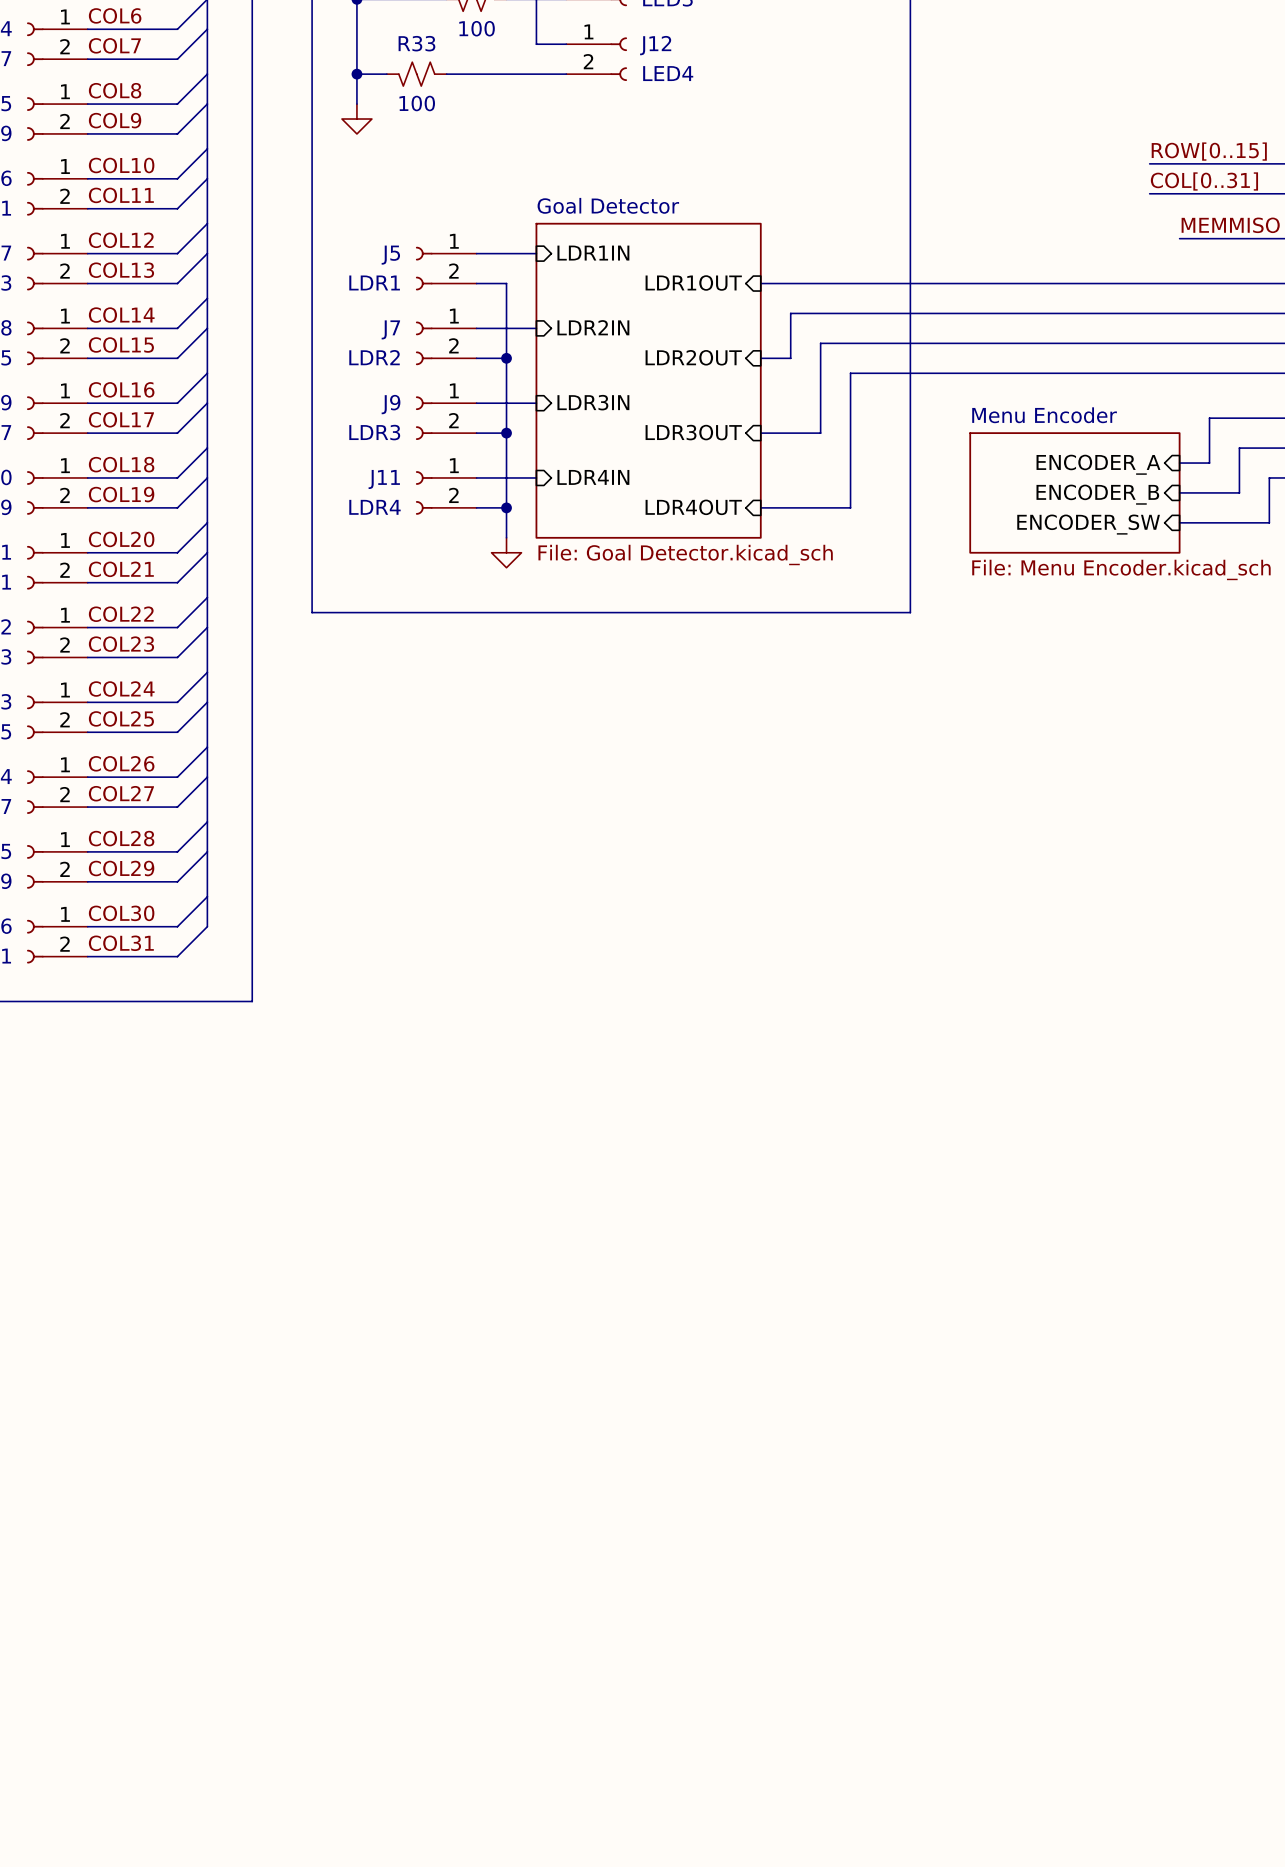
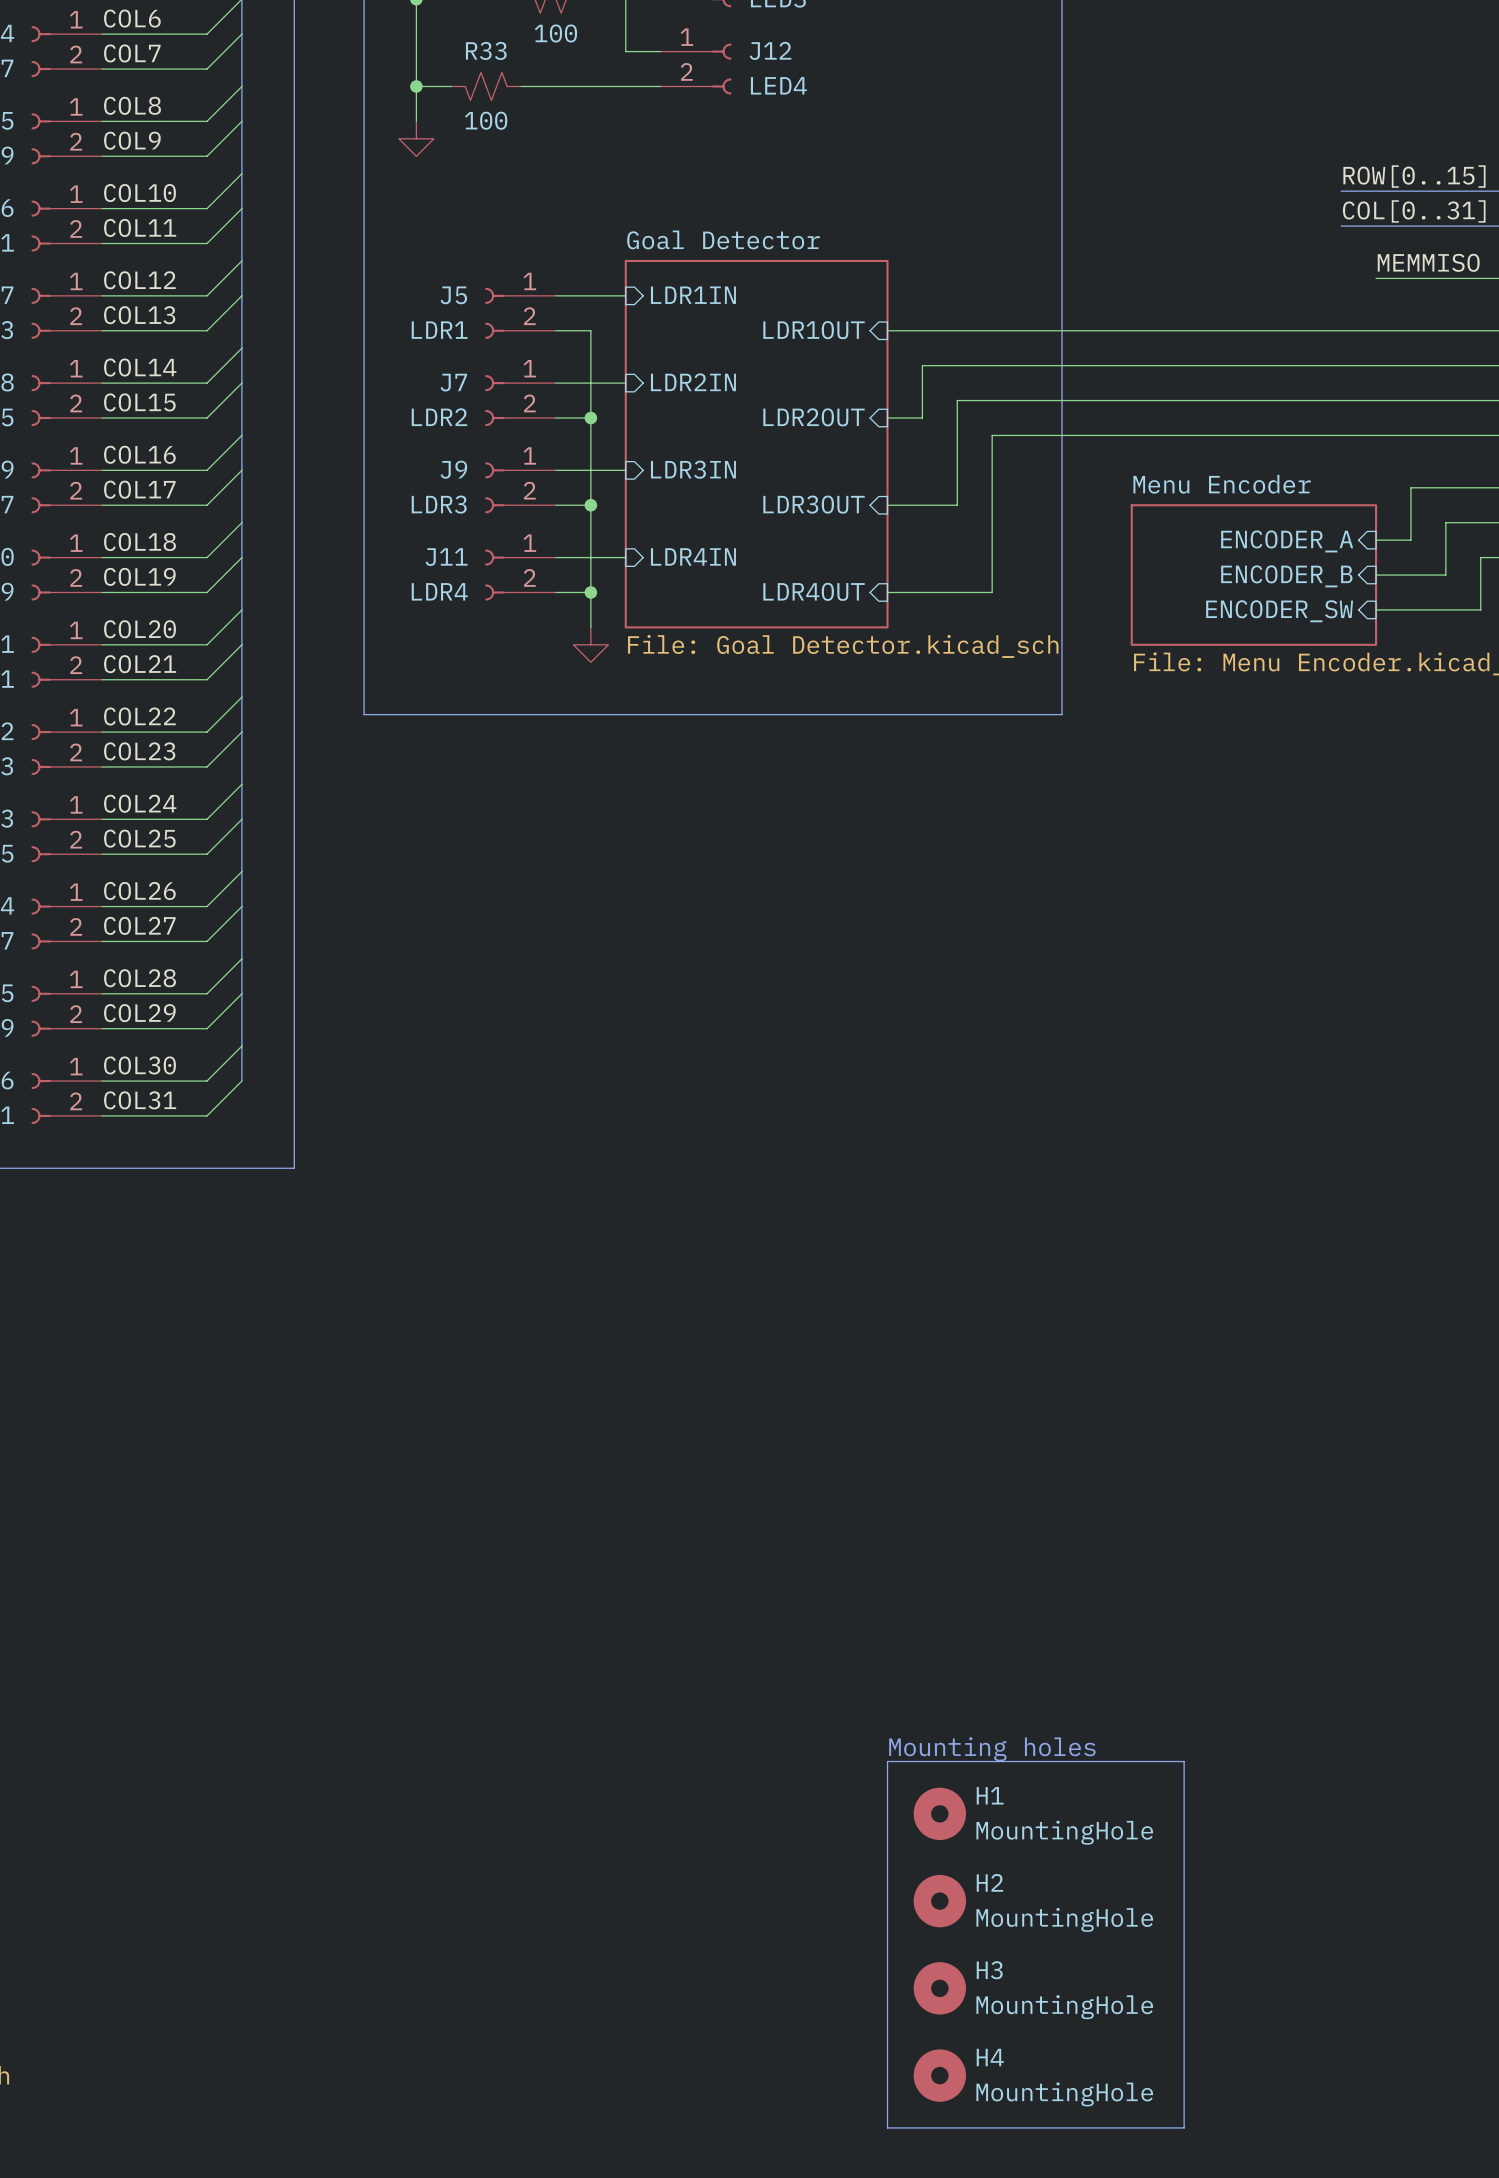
text: none -> Mounting holes (992, 1749)
line: none -> (887, 1761) (1184, 1761) (1184, 2127) (887, 2127) (887, 1761)
H1: none -> MountingHole (939, 1813)
H2: none -> MountingHole (939, 1901)
H3: none -> MountingHole (939, 1988)
H4: none -> MountingHole (939, 2075)

